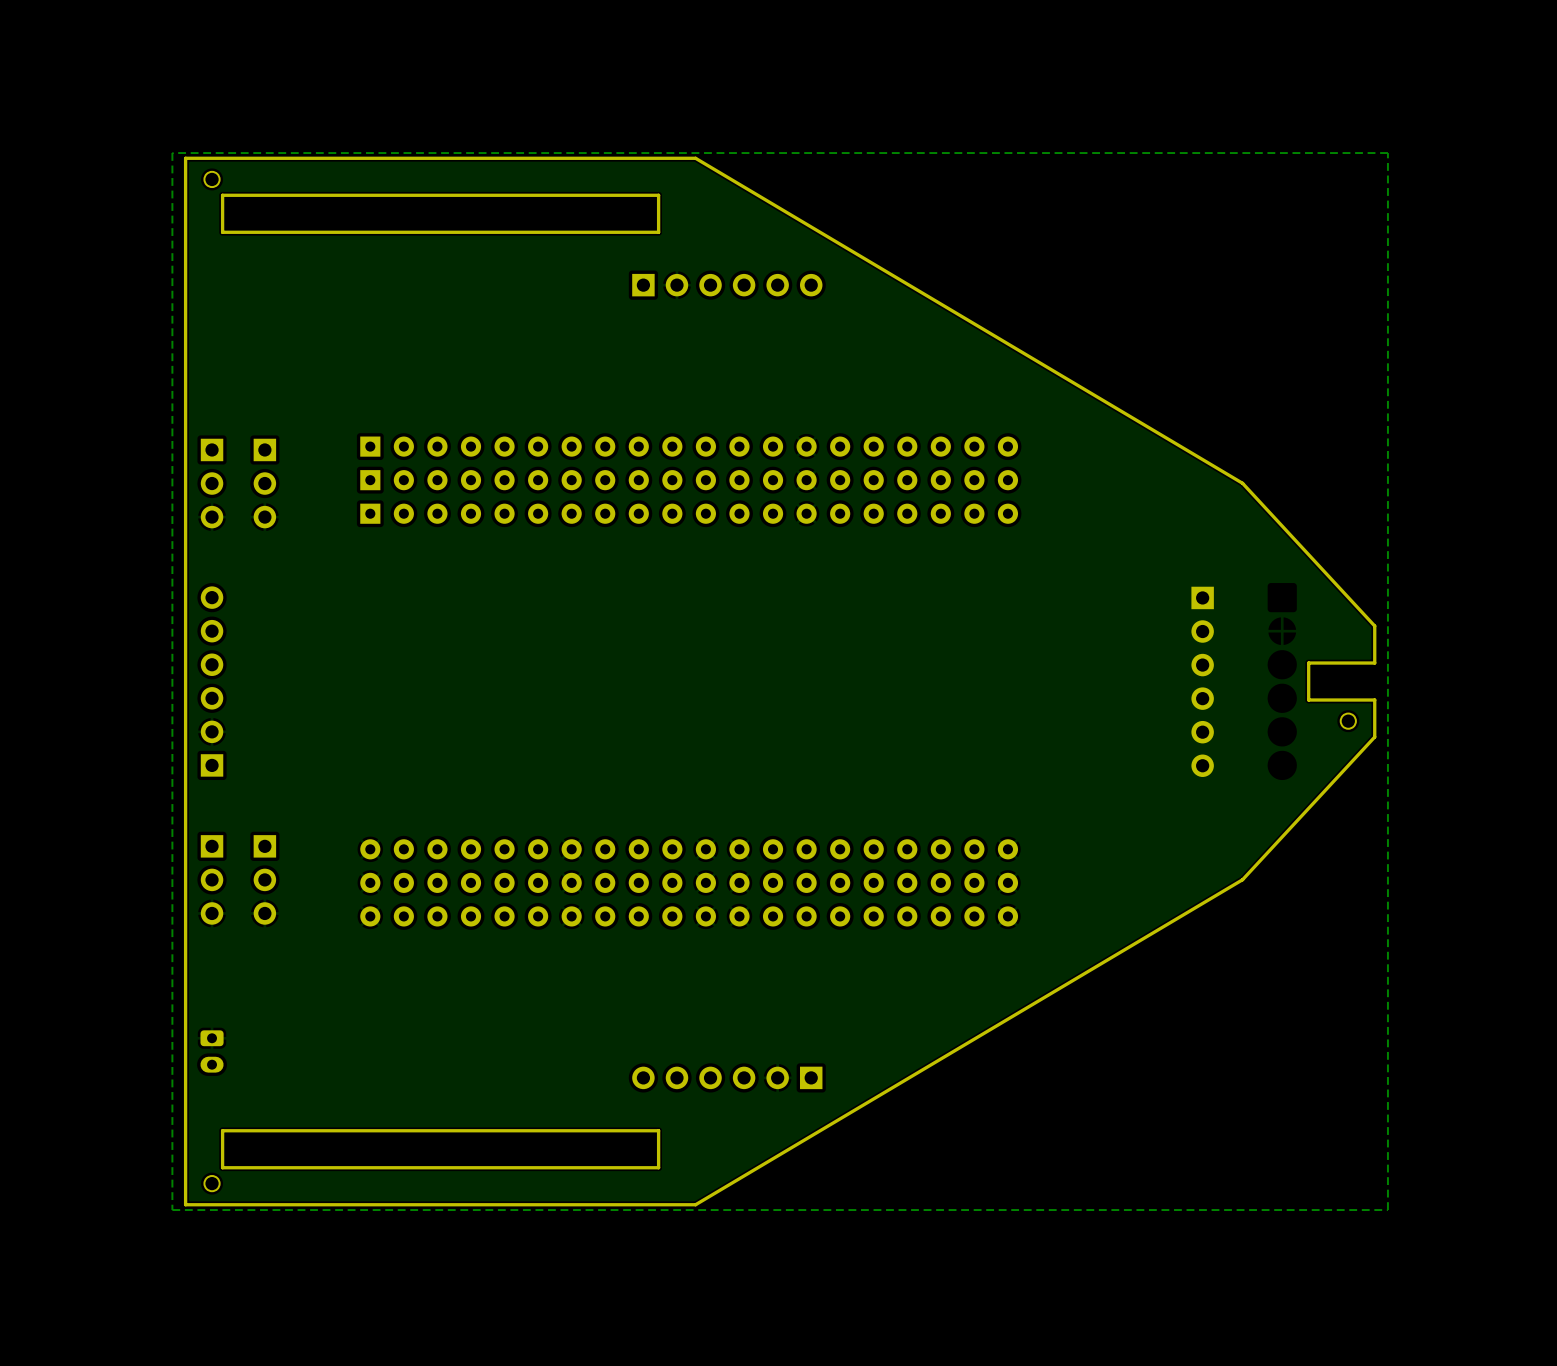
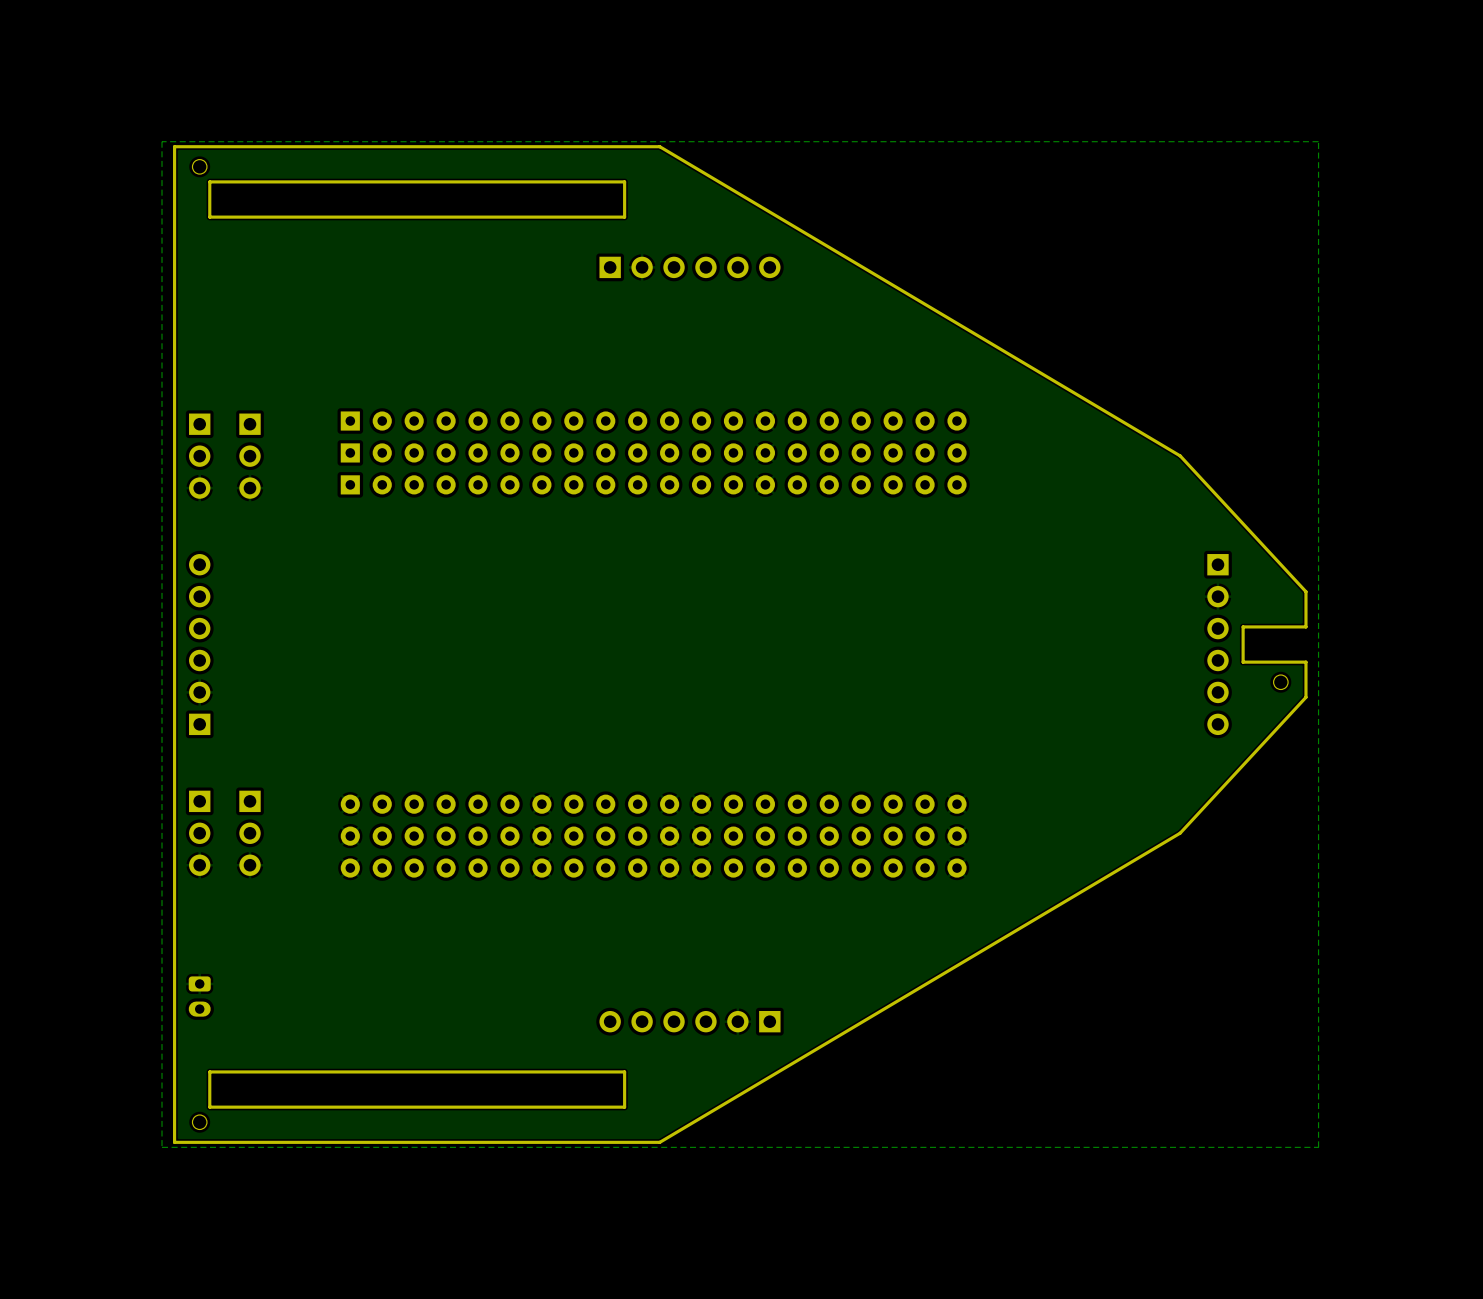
part position: (1202, 681) -> (1217, 644)

